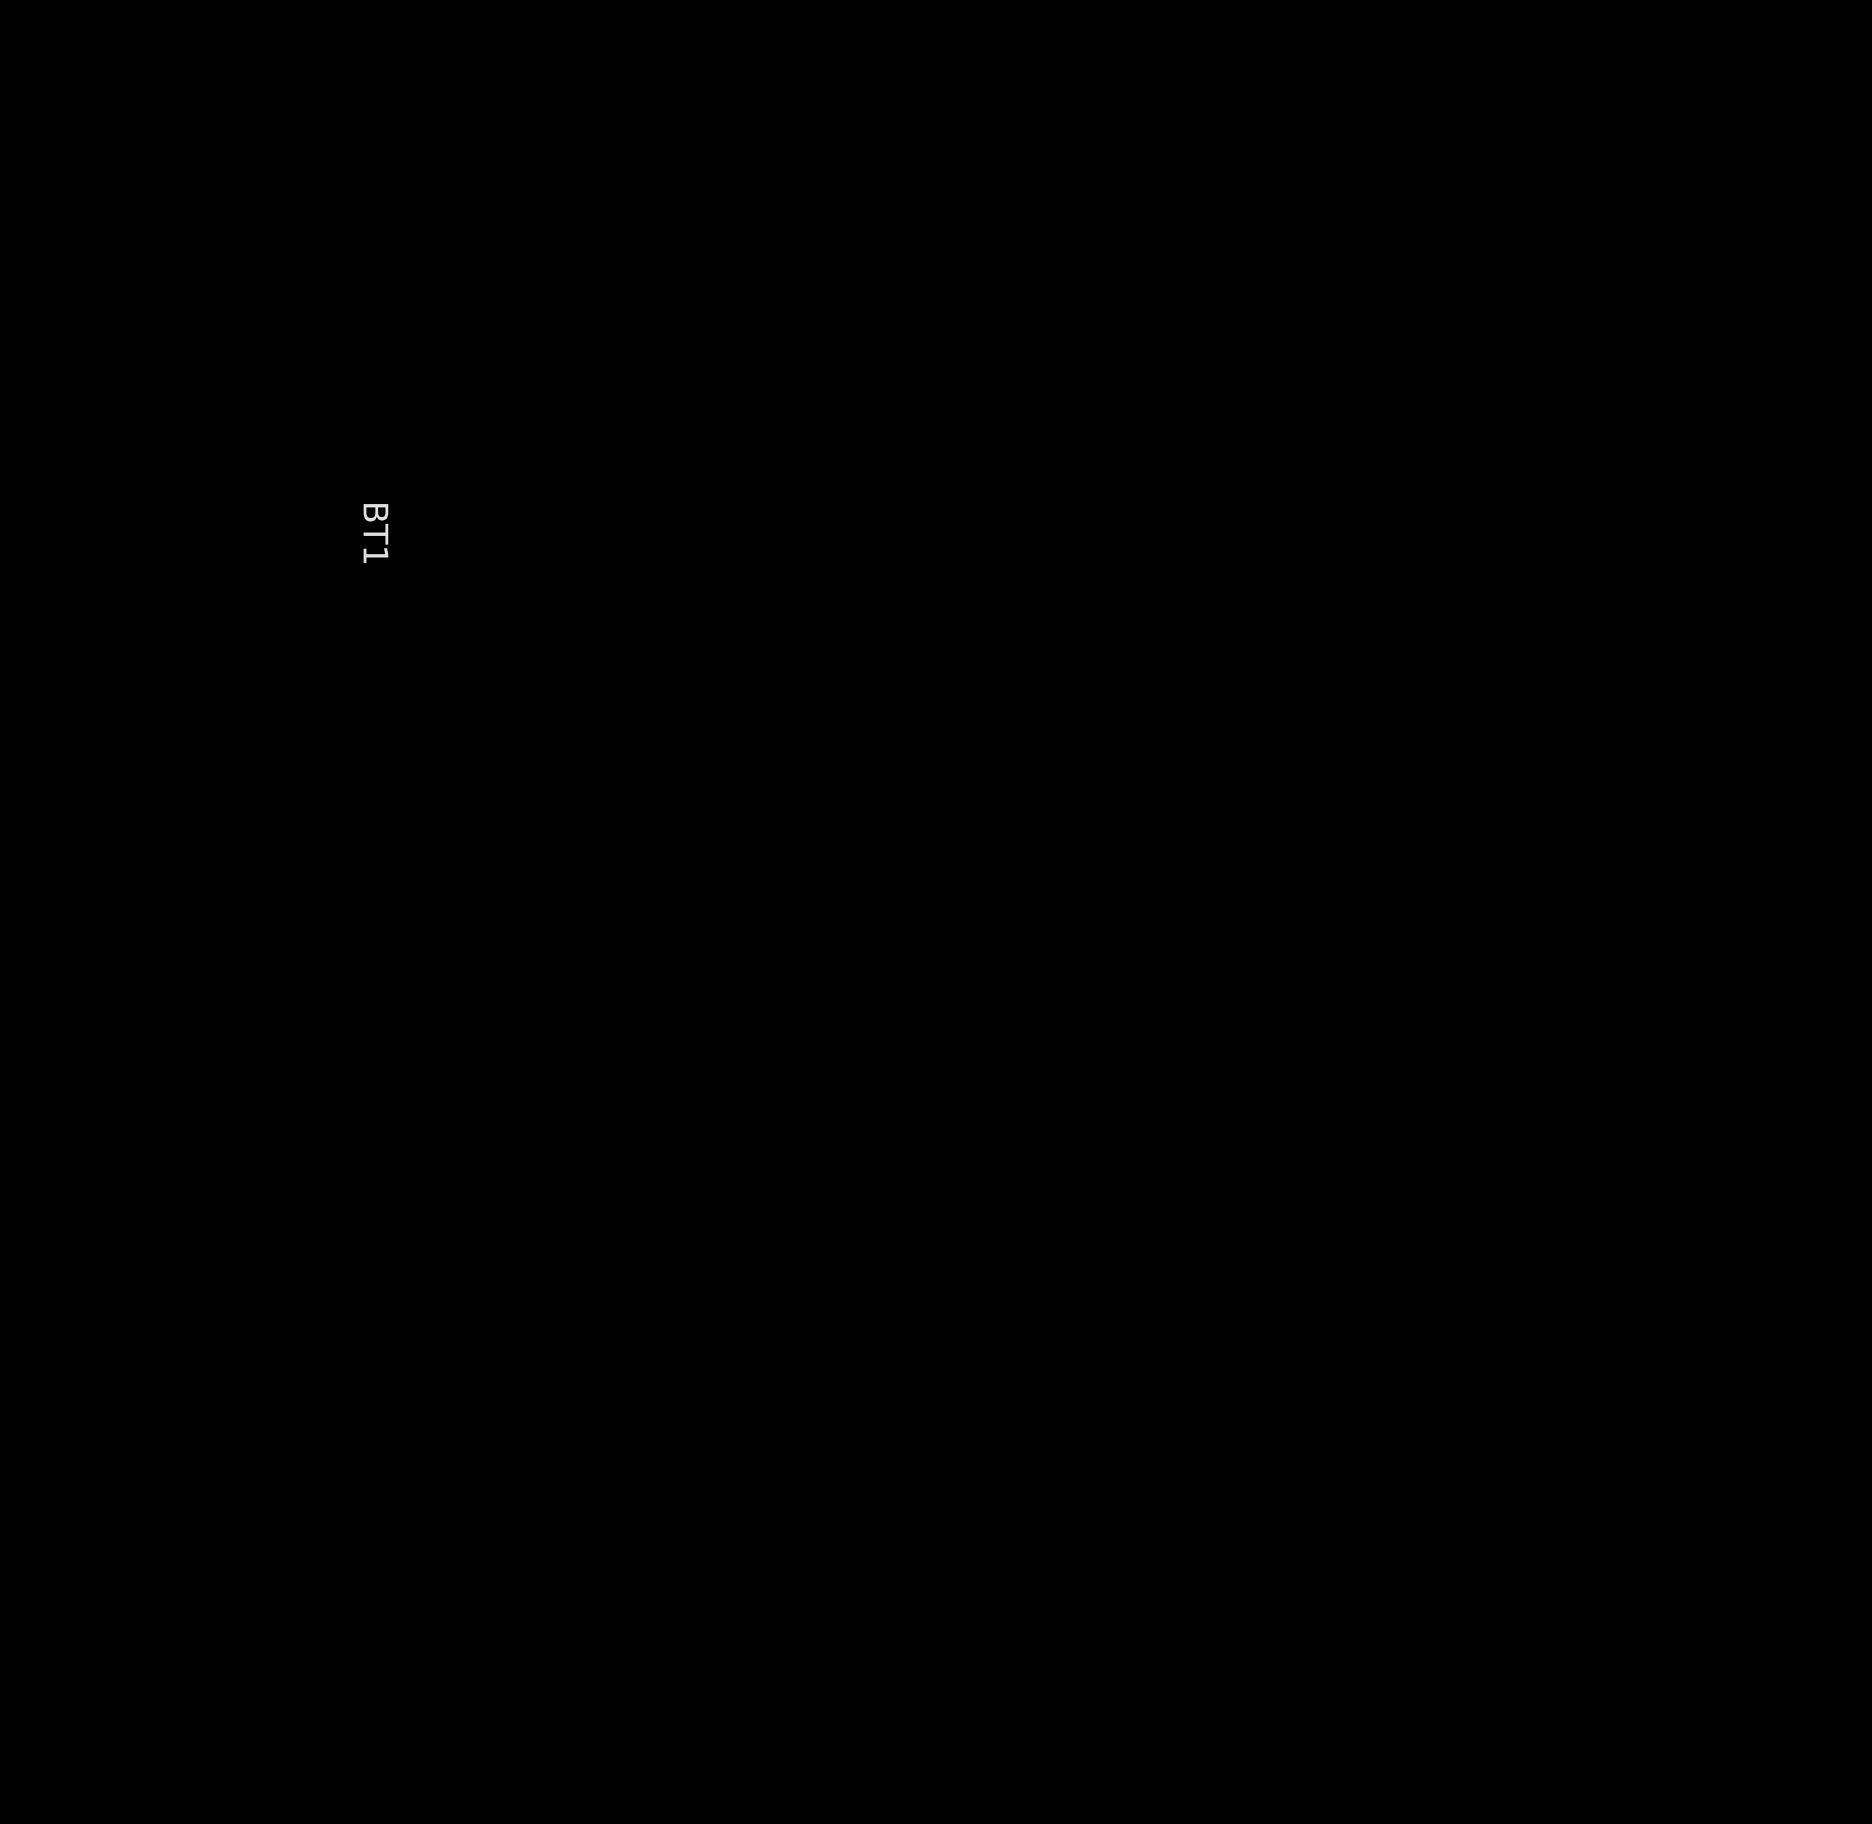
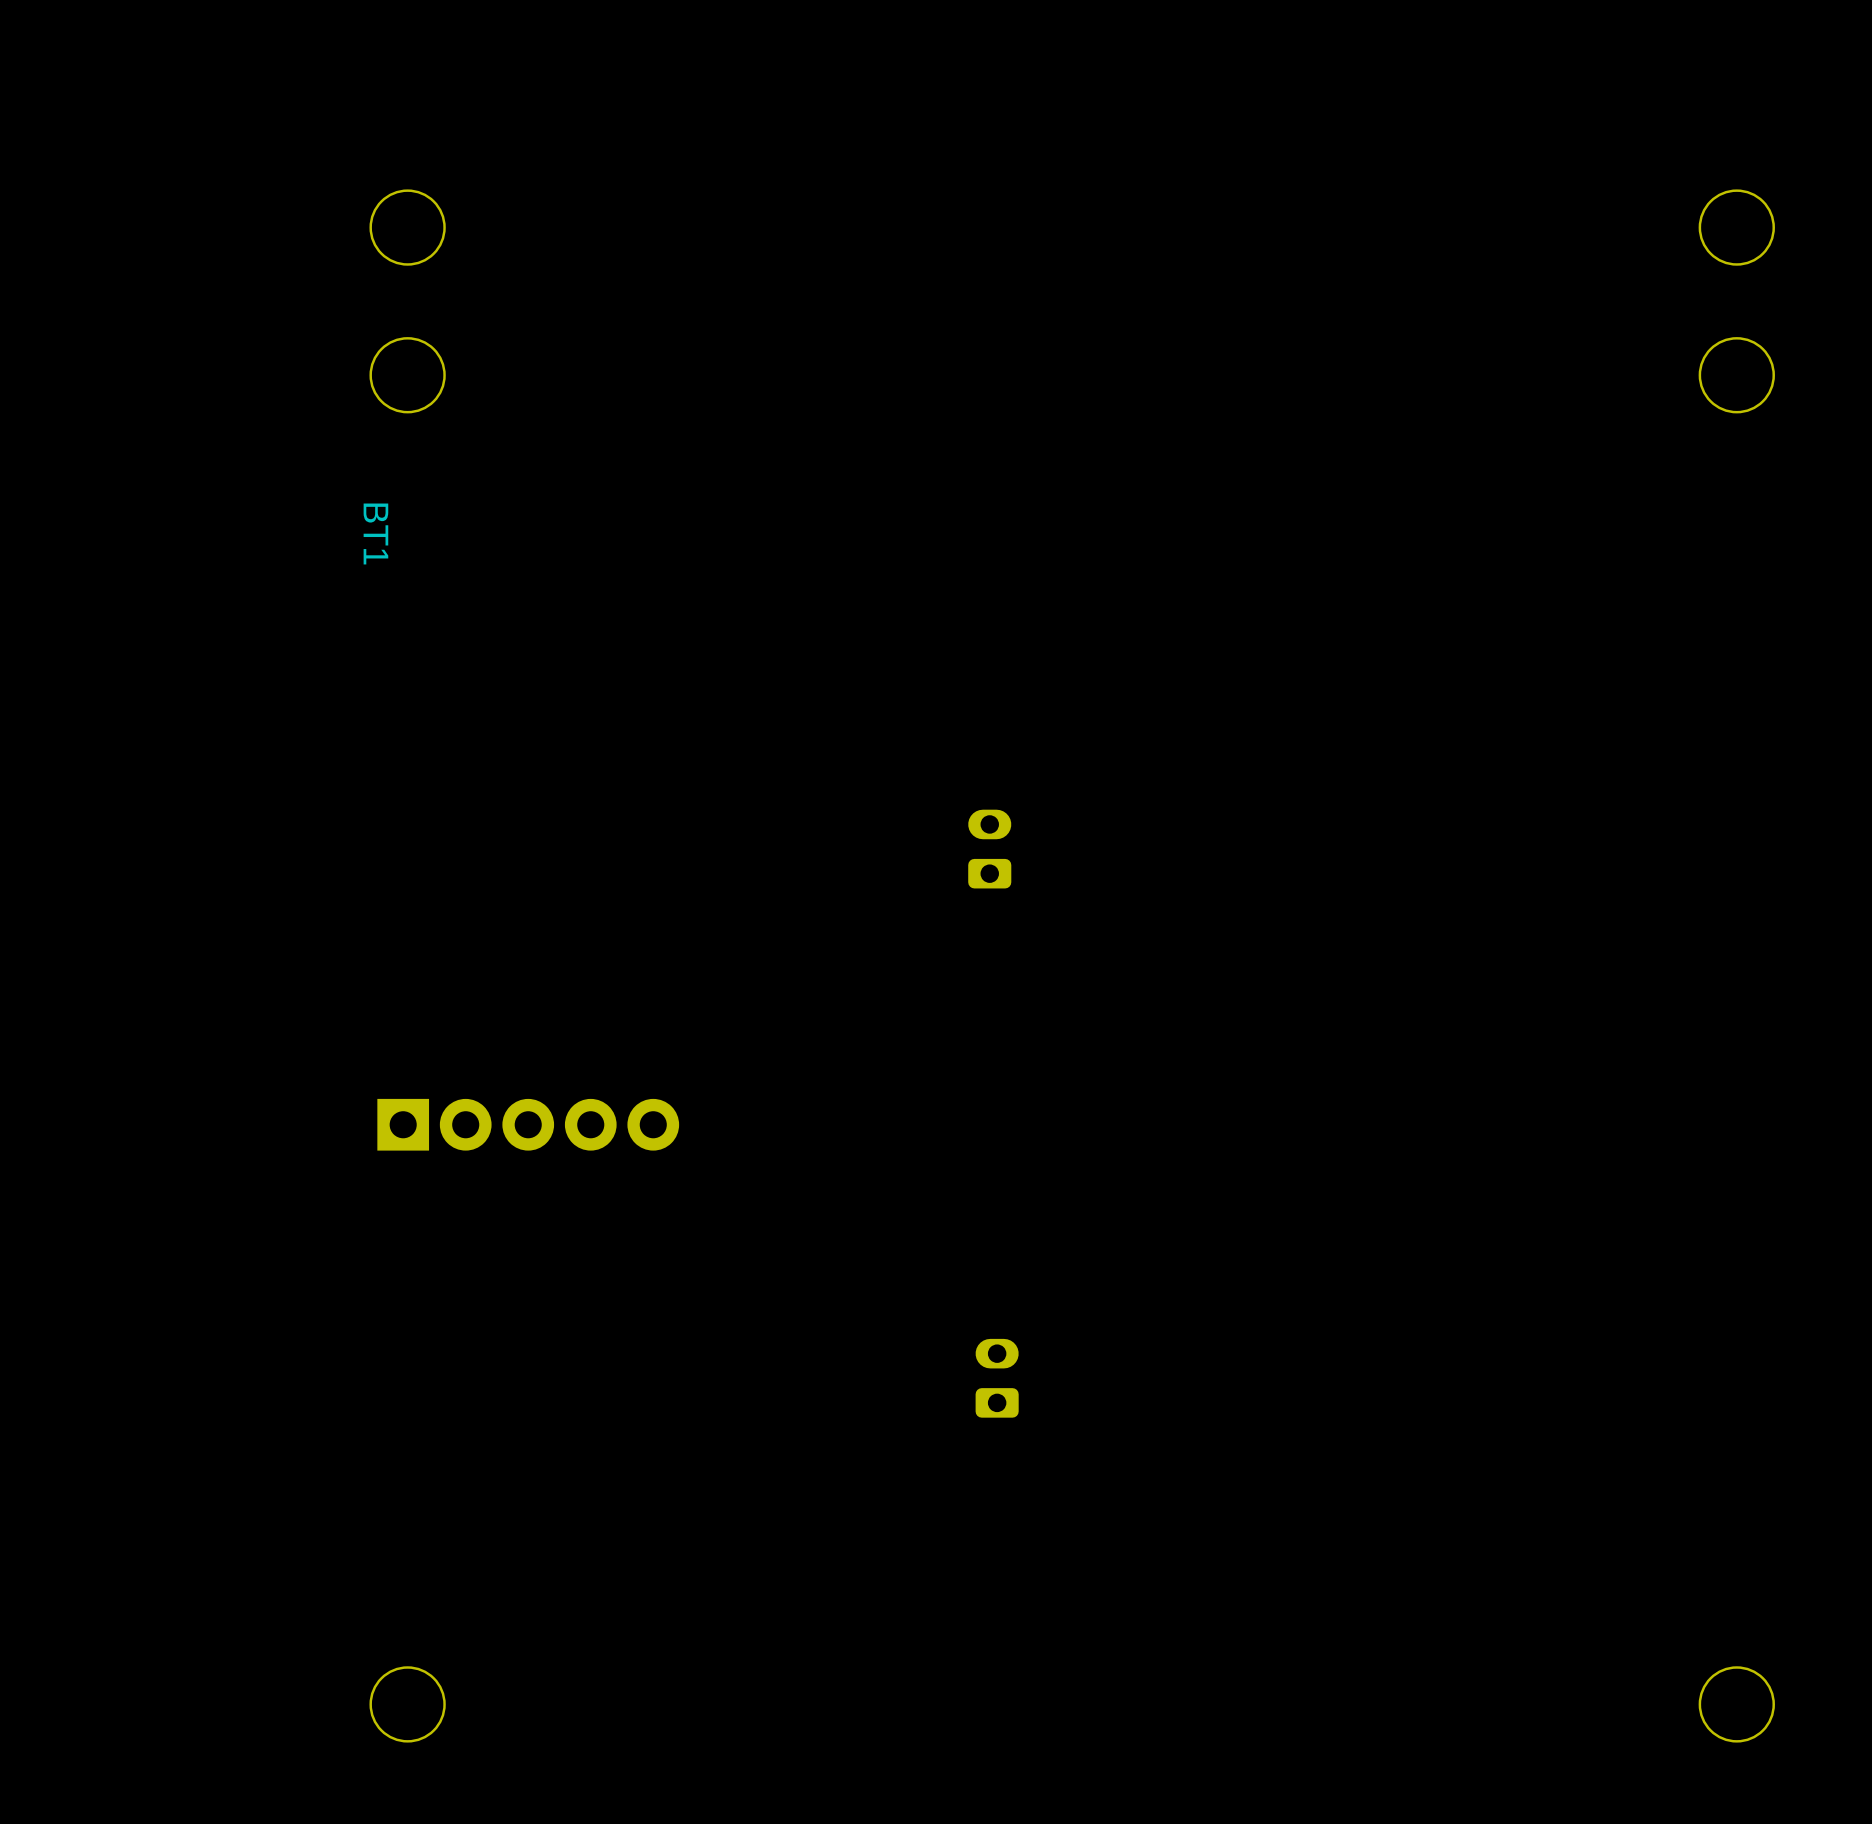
round board edge: none -> [369, 189, 446, 266]
round board edge: none -> [1698, 189, 1775, 266]
round board edge: none -> [369, 337, 446, 414]
round board edge: none -> [1698, 337, 1775, 414]
part: none -> (989, 849)
part: none -> (528, 1124)
part: none -> (997, 1378)
round board edge: none -> [369, 1666, 446, 1743]
round board edge: none -> [1698, 1666, 1775, 1743]

